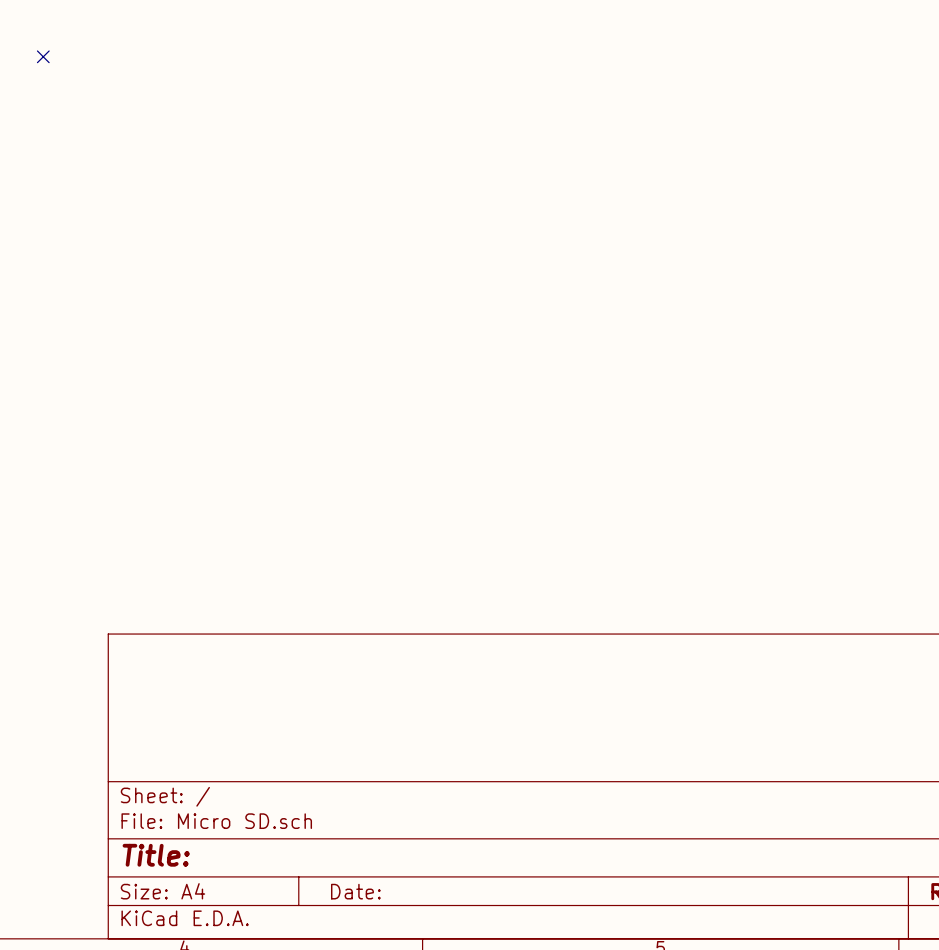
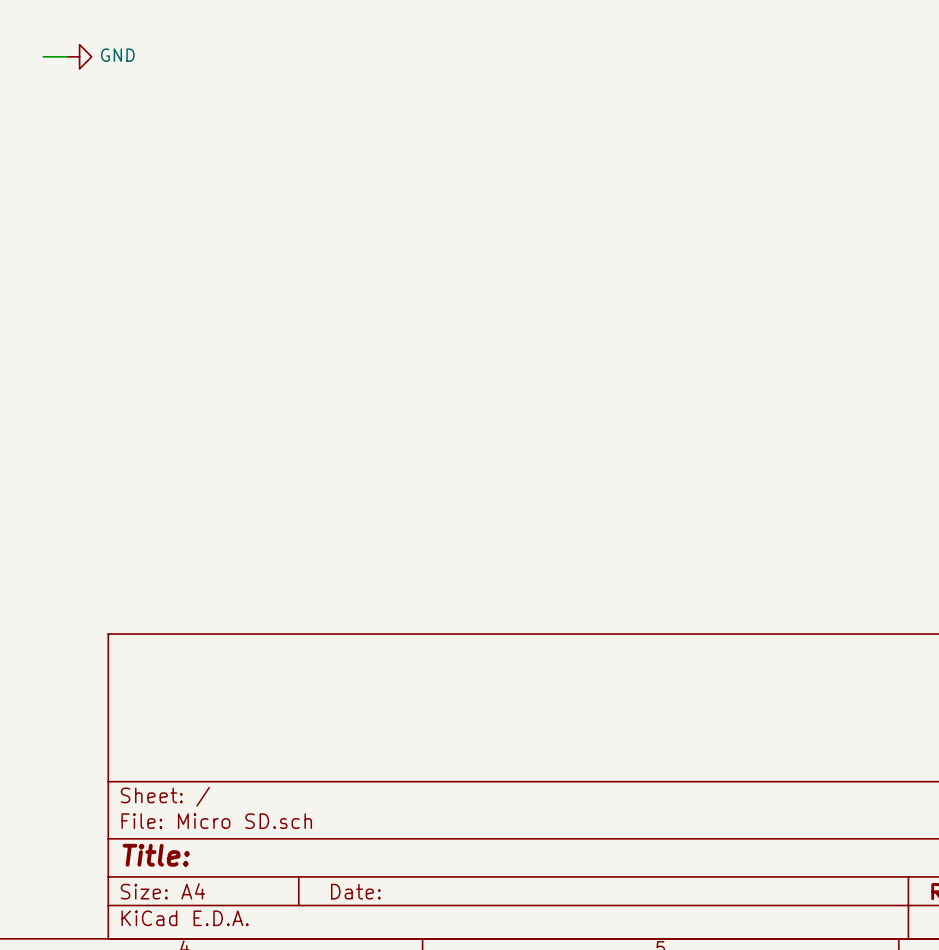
wire: none -> (43, 56) (67, 56)
no-connect mark: (43, 56) -> none
power symbol: none -> GND (79, 56)

